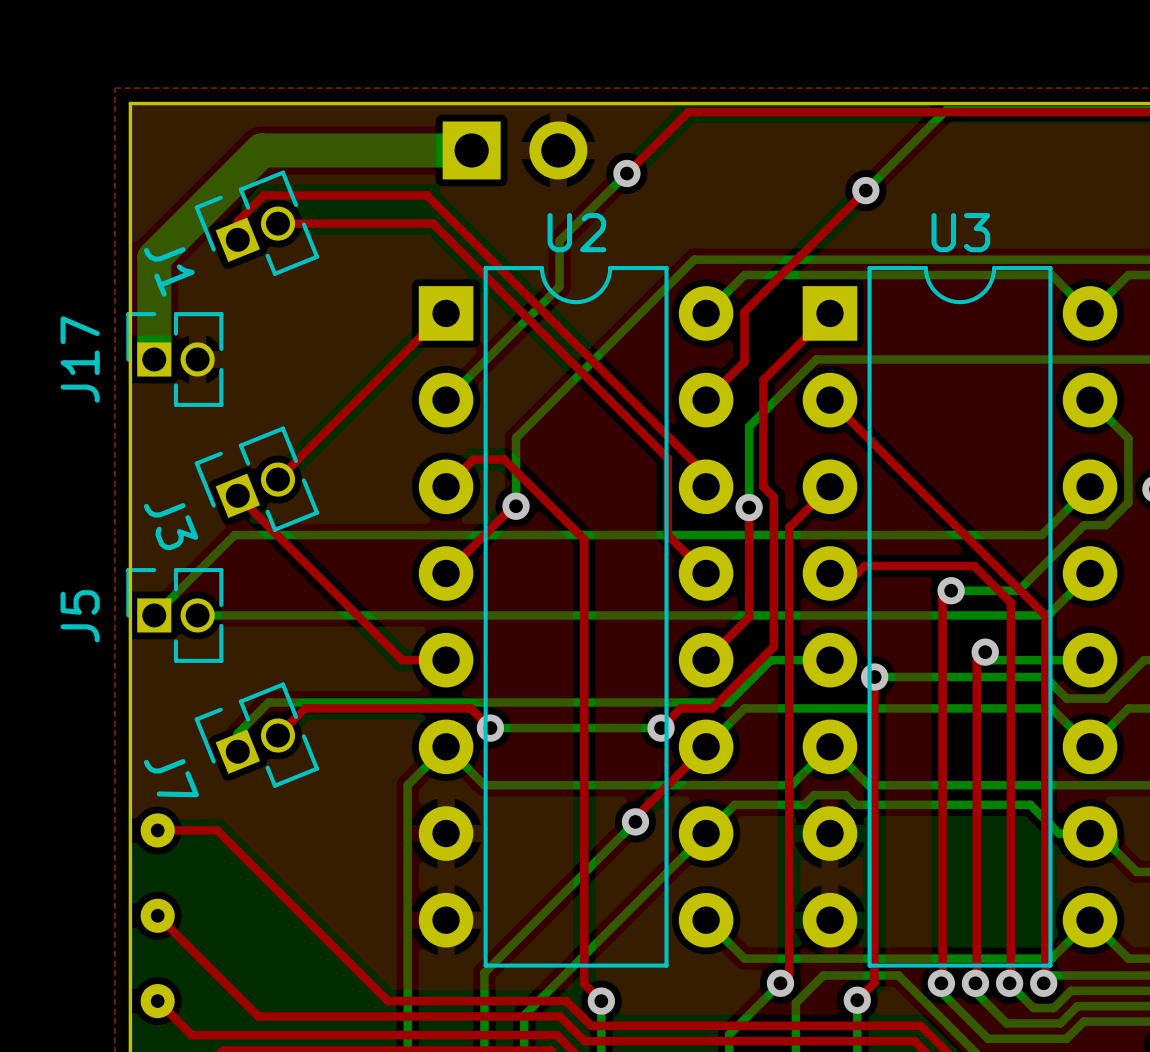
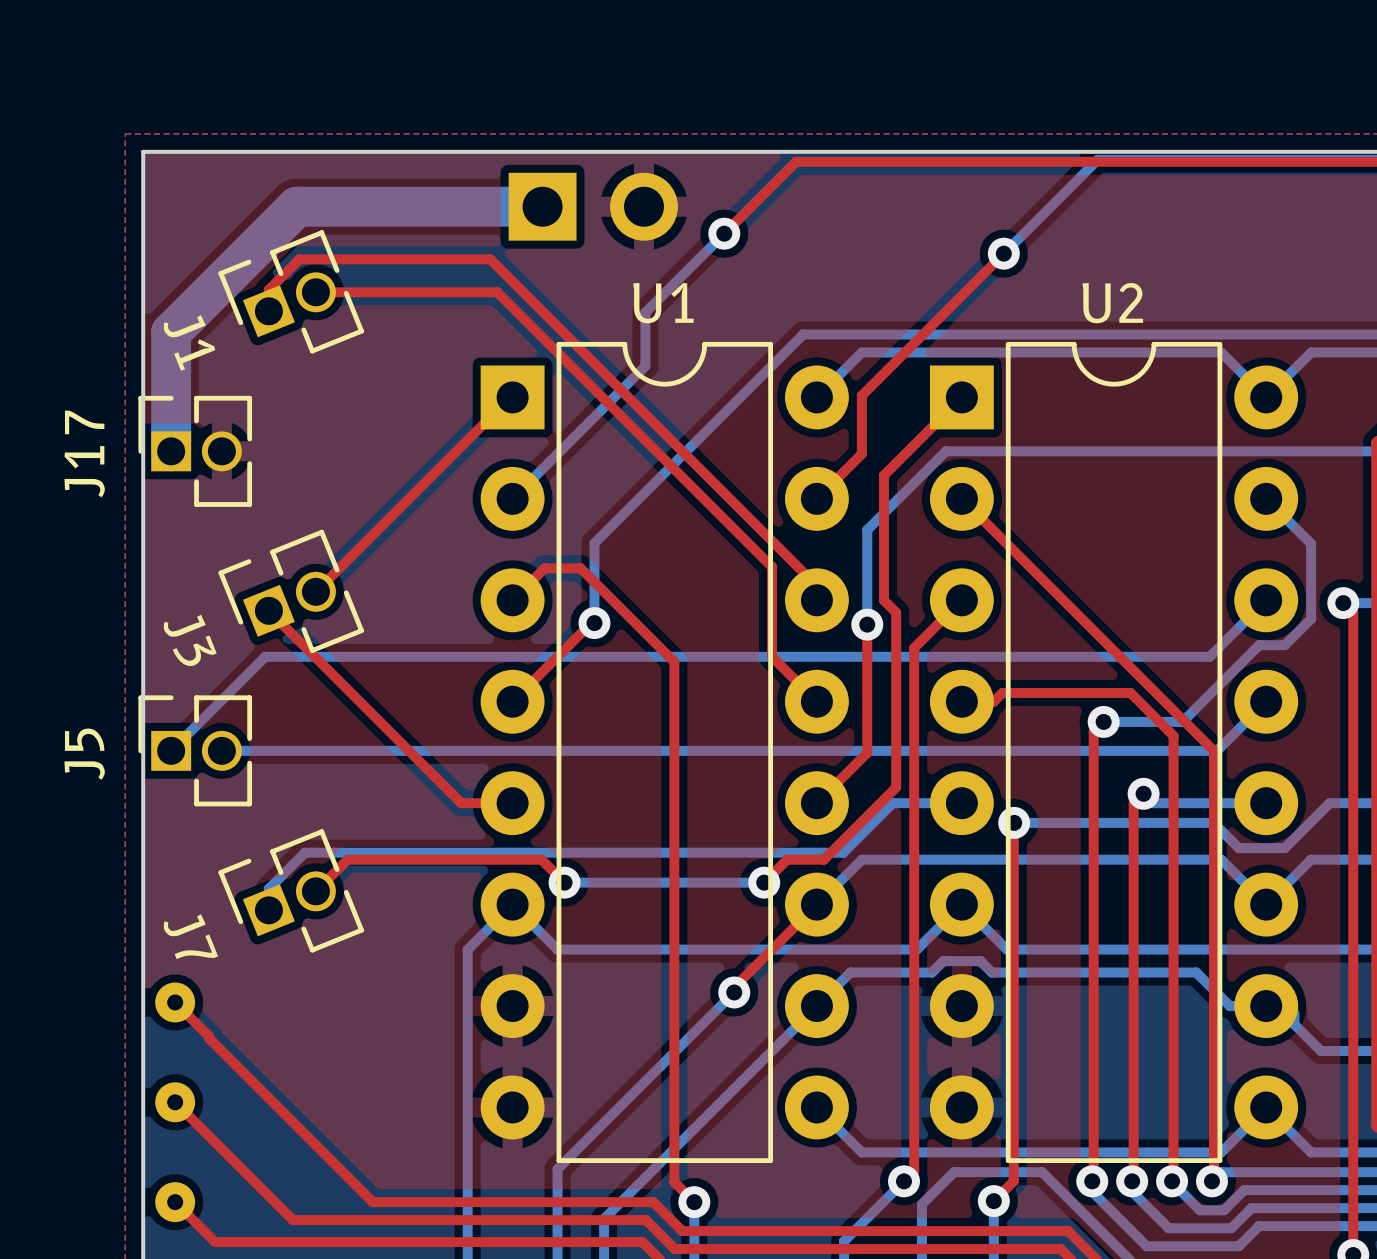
U2 name: U2 (576, 232) -> U1 (663, 303)
U3 name: U3 (960, 232) -> U2 (1112, 303)
top track: (157, 830) (217, 830) (388, 1001) -> (175, 1002) (372, 1202) (444, 1202)

